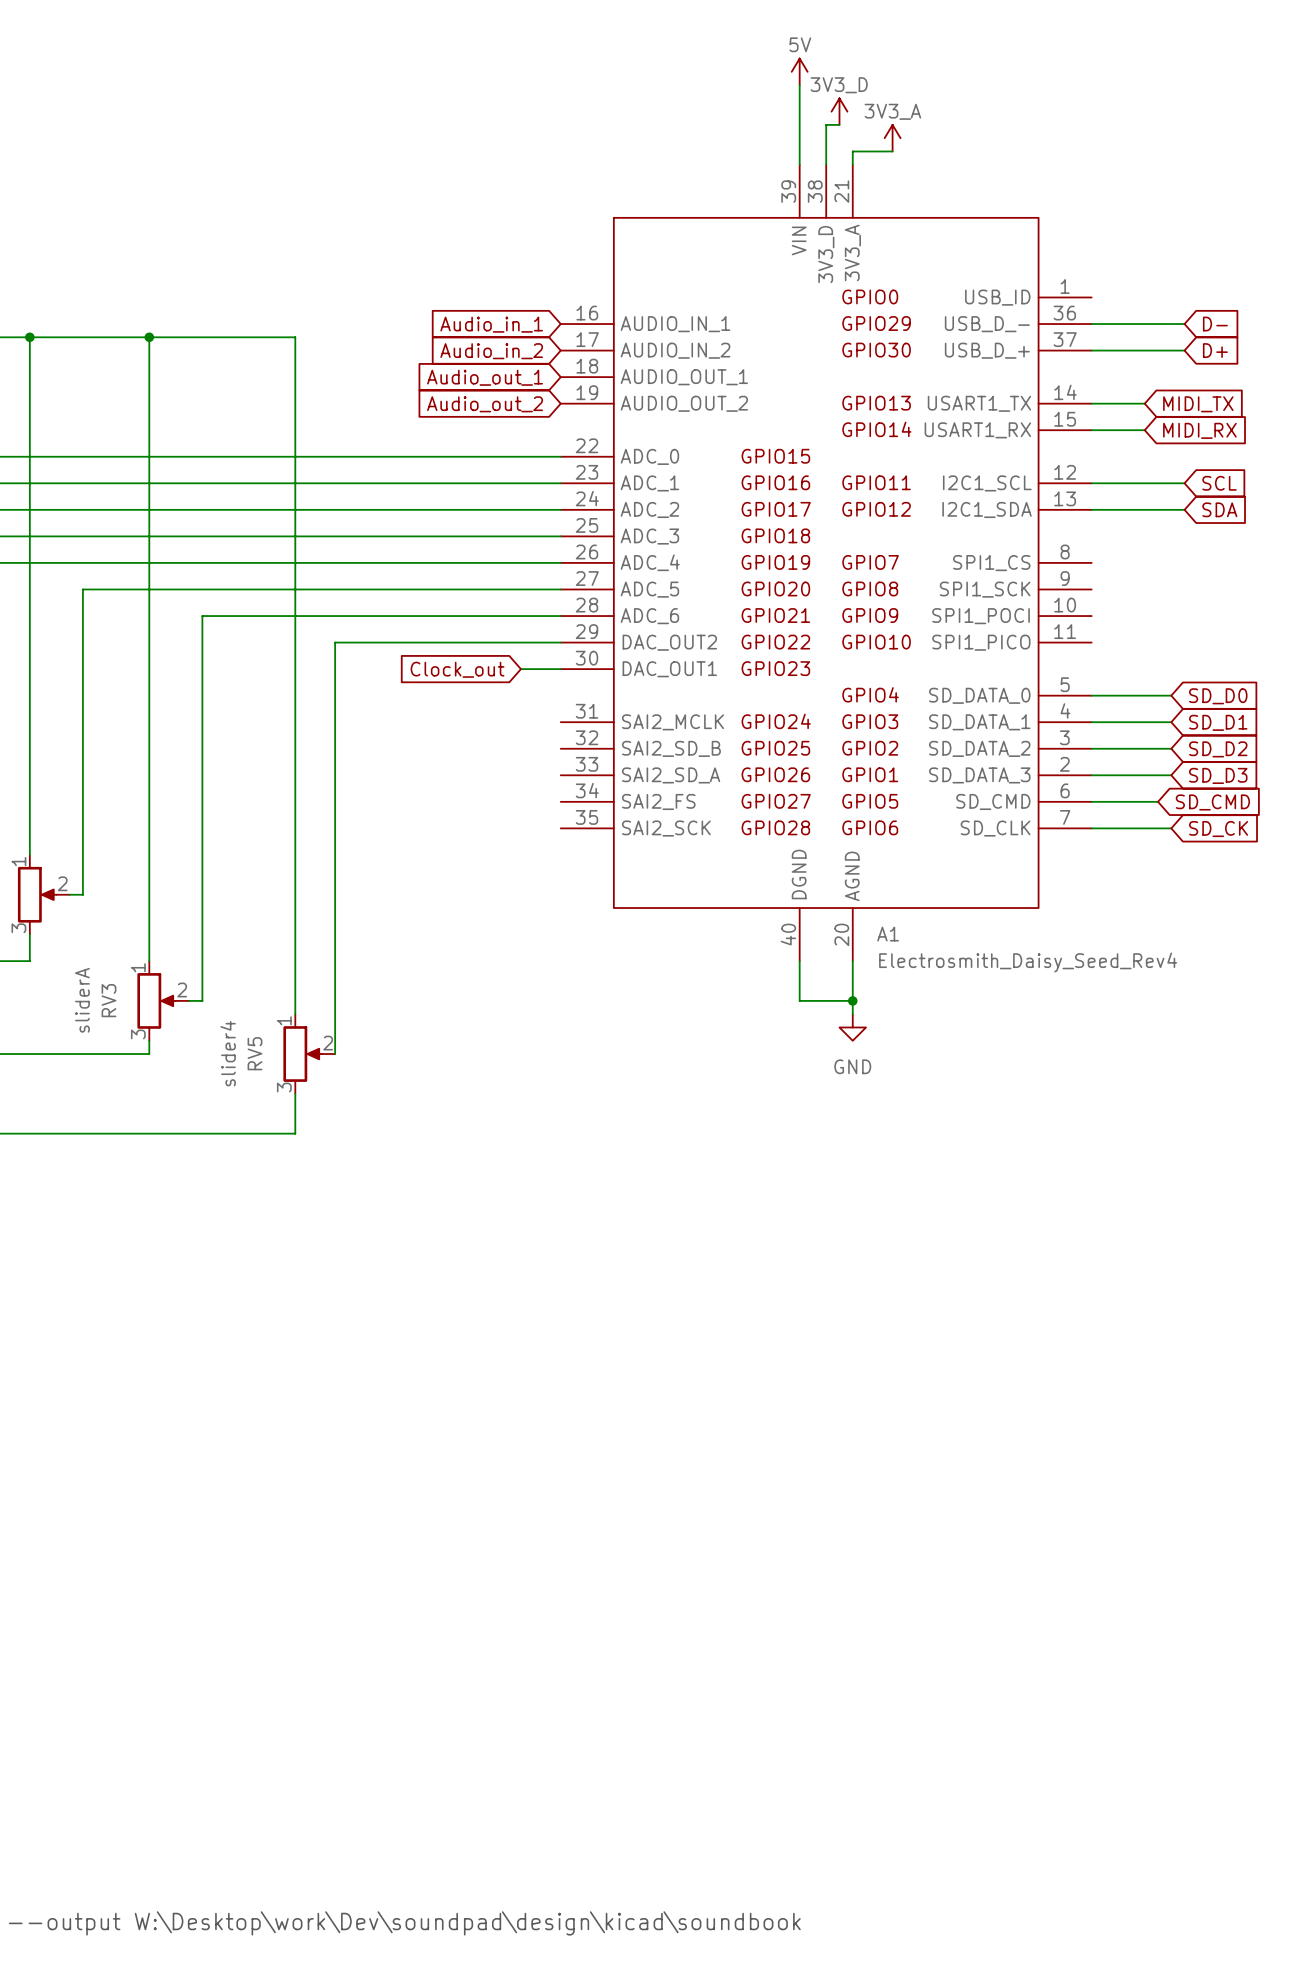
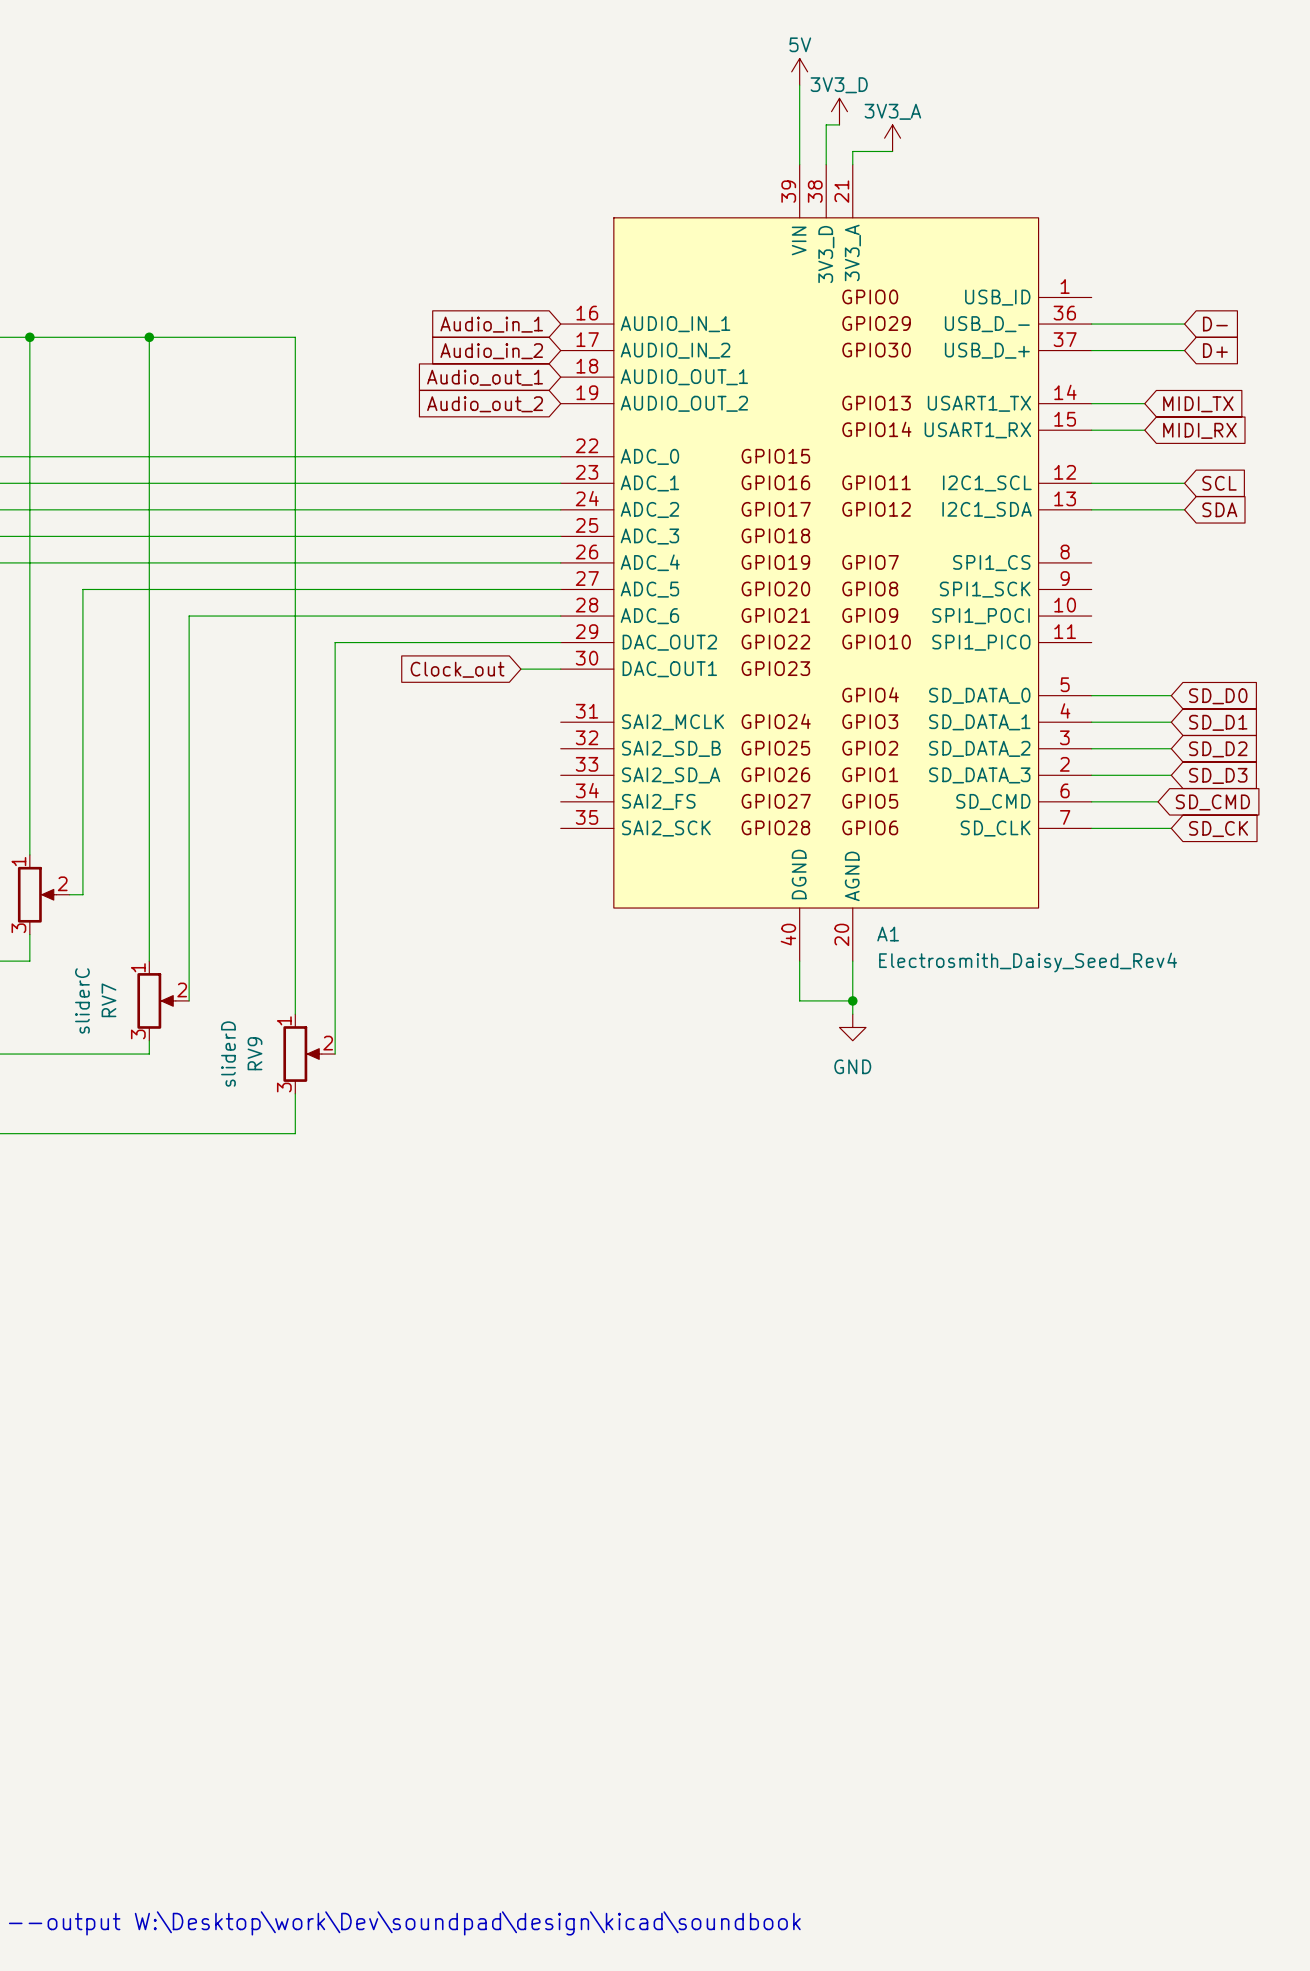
wire: (202, 616) (202, 1000) (189, 1000) -> (202, 616) (189, 616) (189, 1000)
RV3 value: sliderA (82, 1000) -> sliderC (82, 1000)
RV3 name: RV3 (108, 1000) -> RV7 (108, 1000)
RV5 value: slider4 (228, 1053) -> sliderD (228, 1054)
RV5 name: RV5 (254, 1053) -> RV9 (254, 1053)

